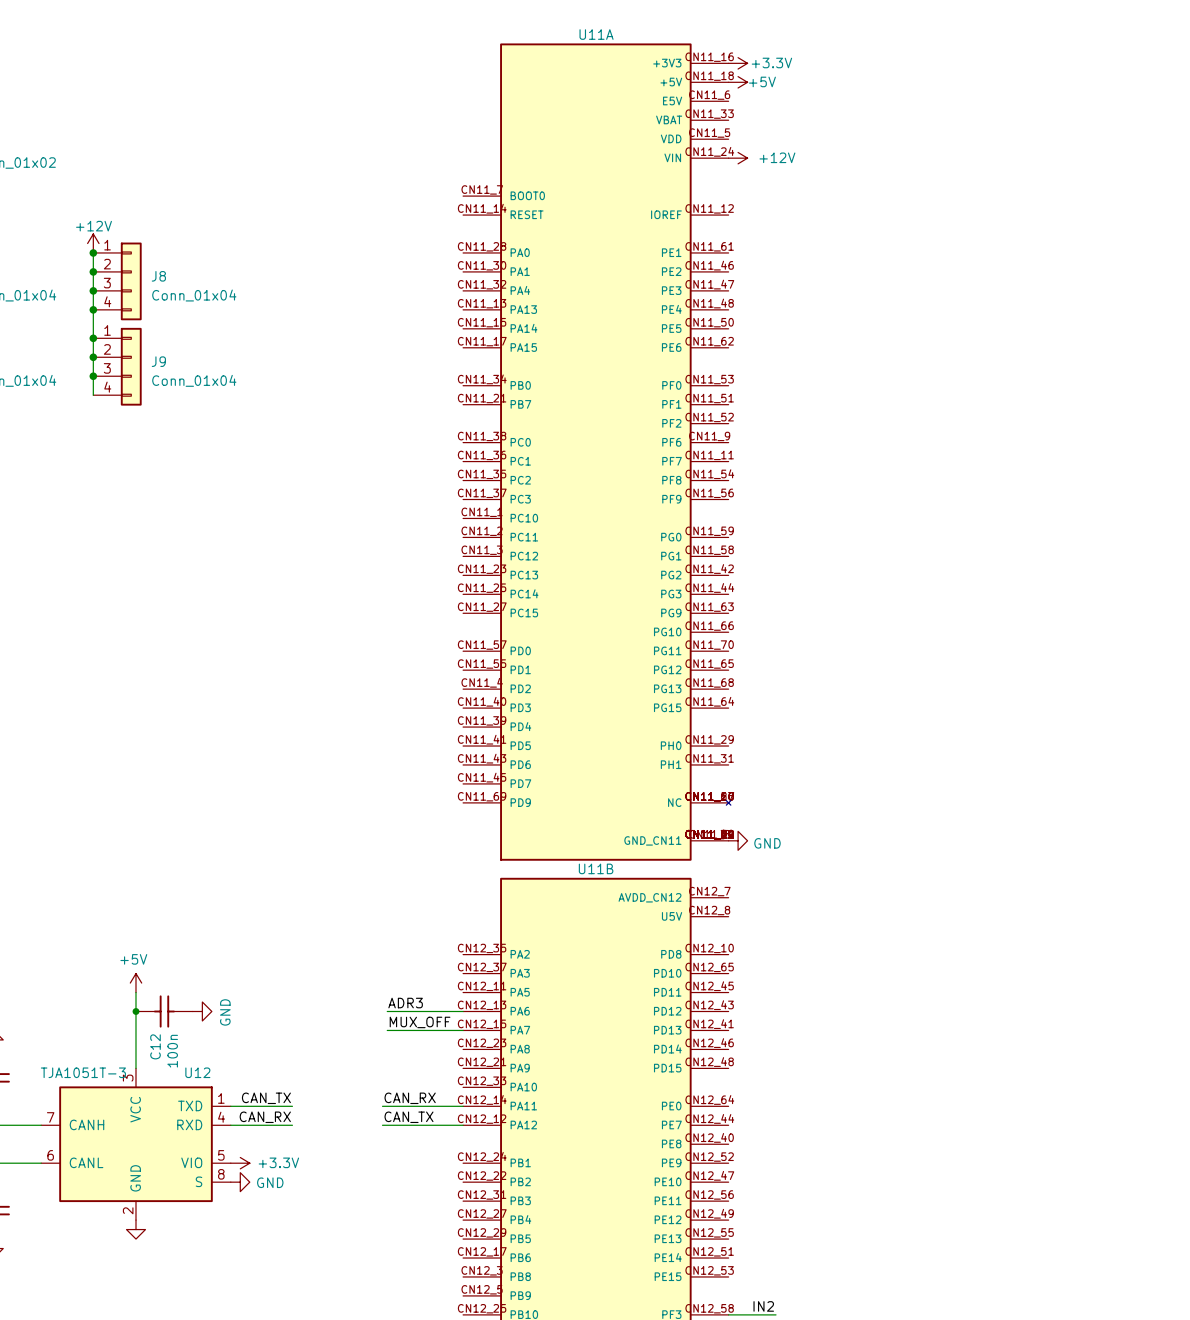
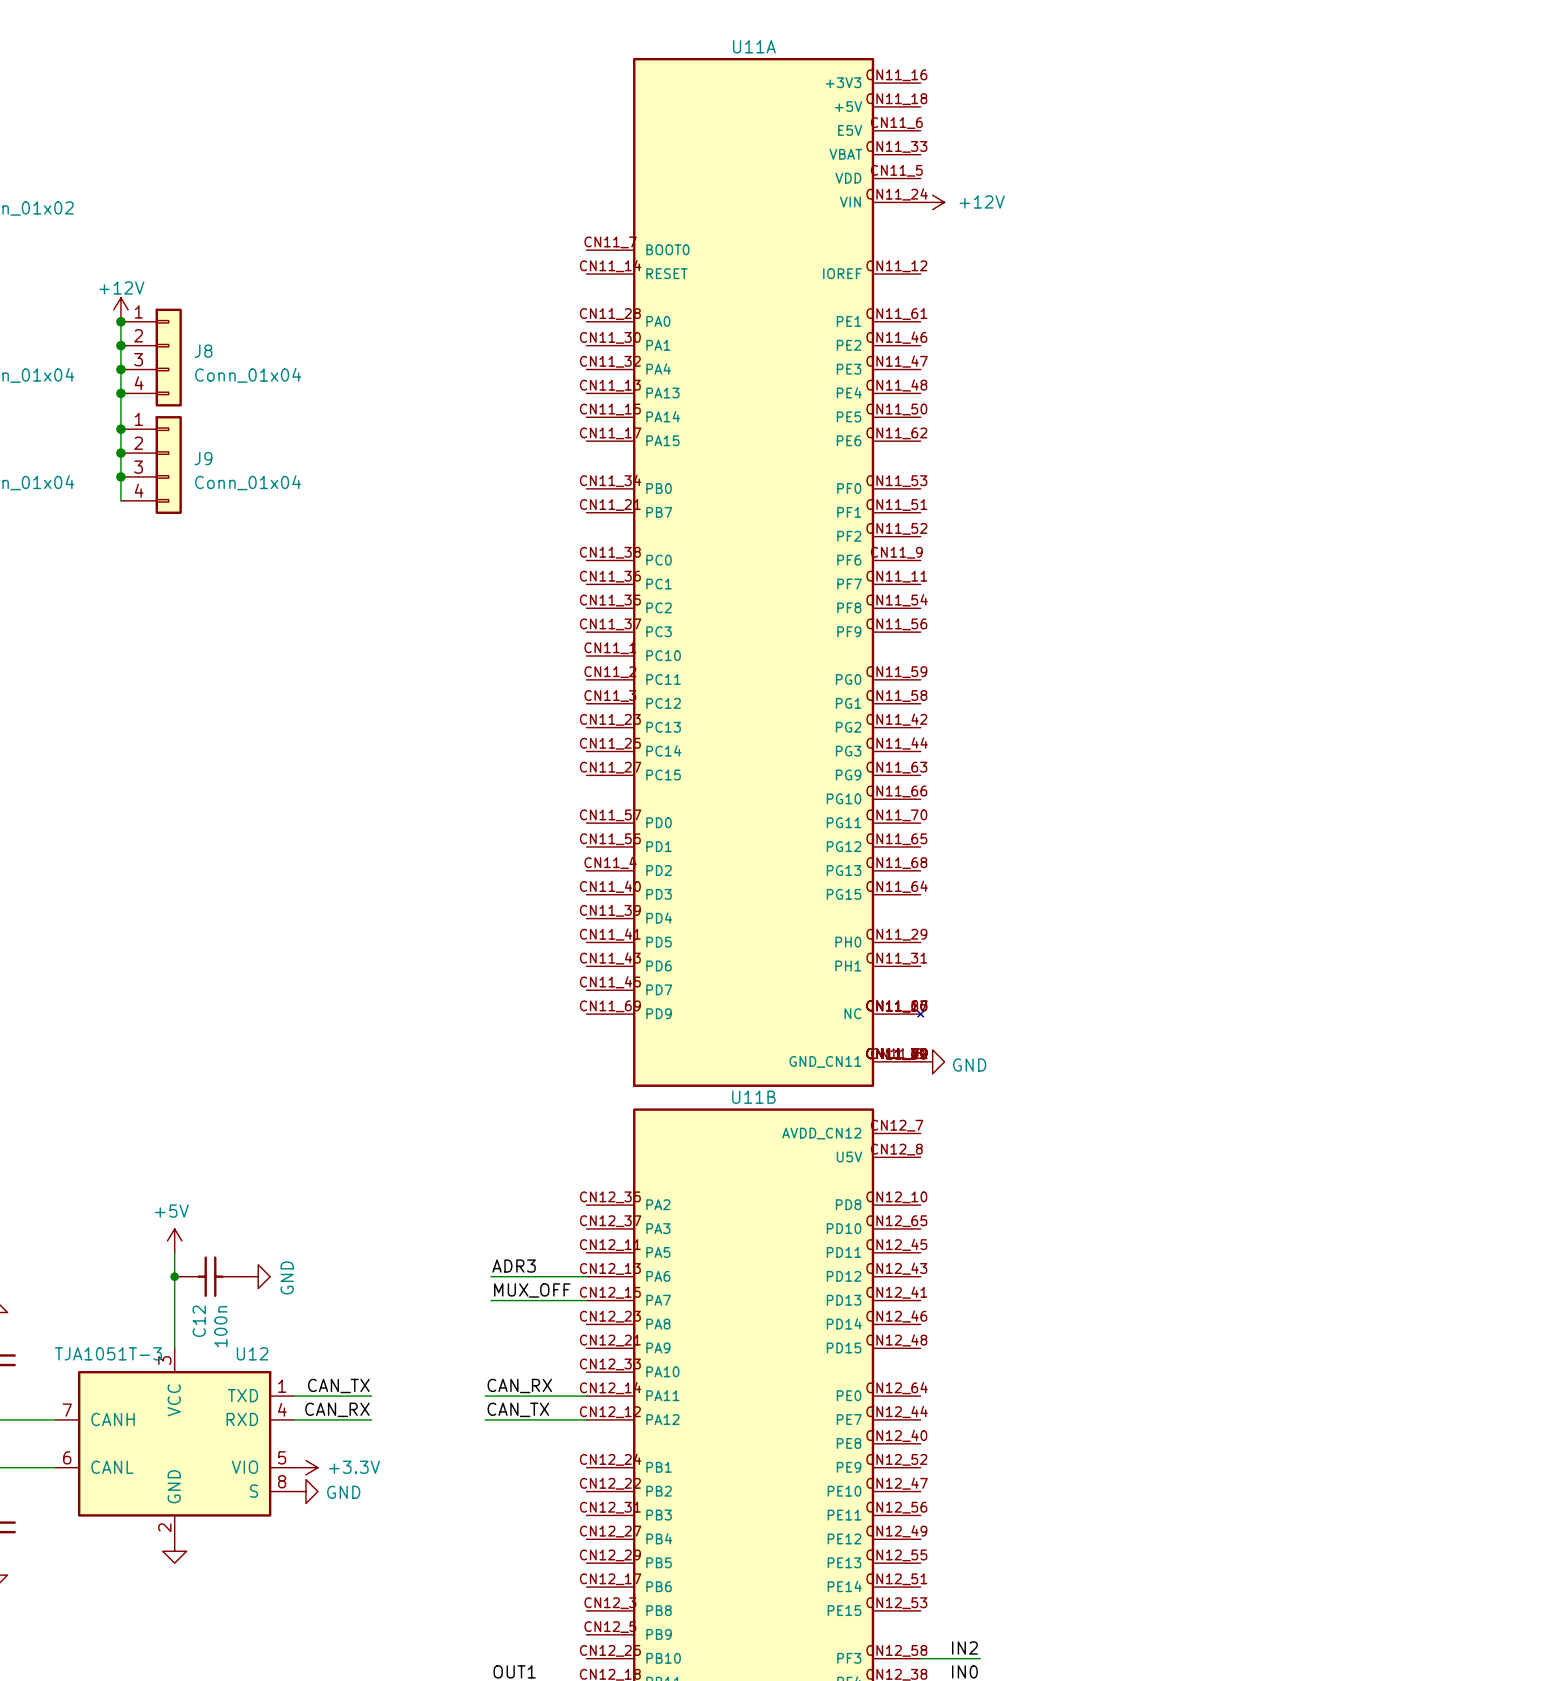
power symbol: +3.3V (738, 63) -> none
power symbol: +5V (738, 82) -> none

